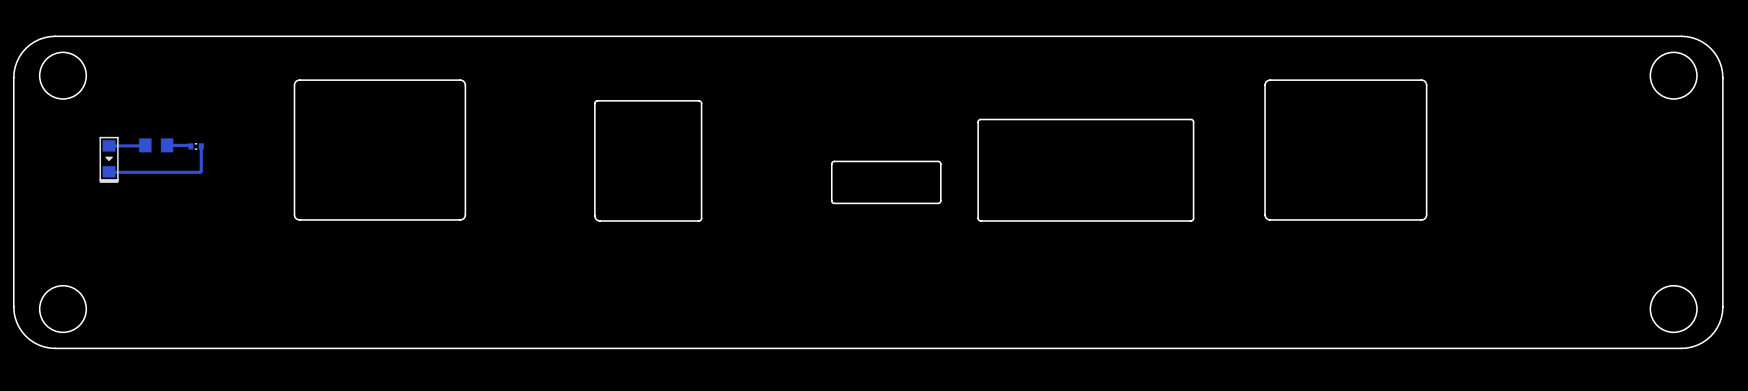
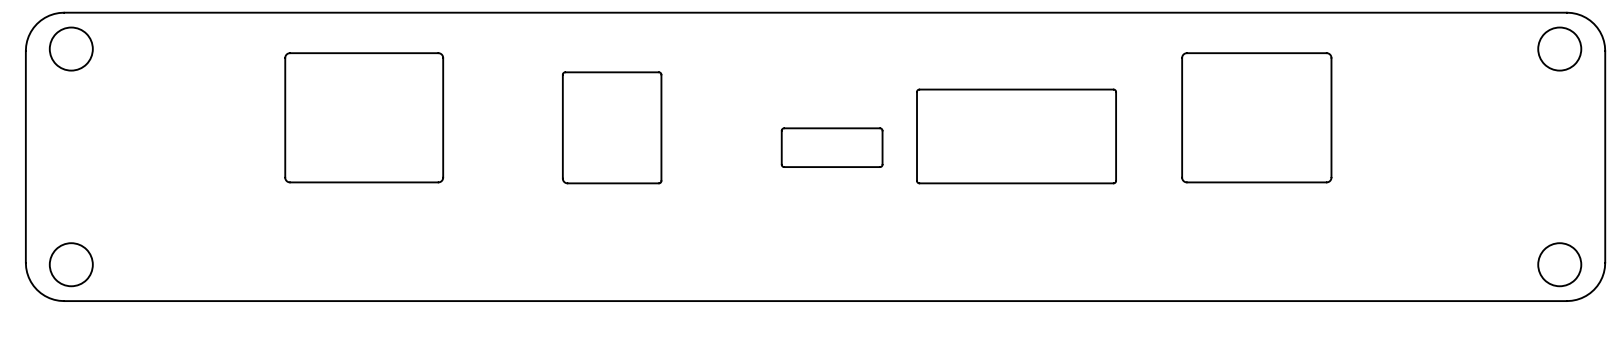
bottom track: (145, 145) (109, 145) -> none
part: (156, 145) -> none
bottom track: (167, 145) (190, 146) -> none
part: (196, 146) -> none
bottom track: (201, 146) (200, 172) (109, 171) -> none
part: (109, 159) -> none

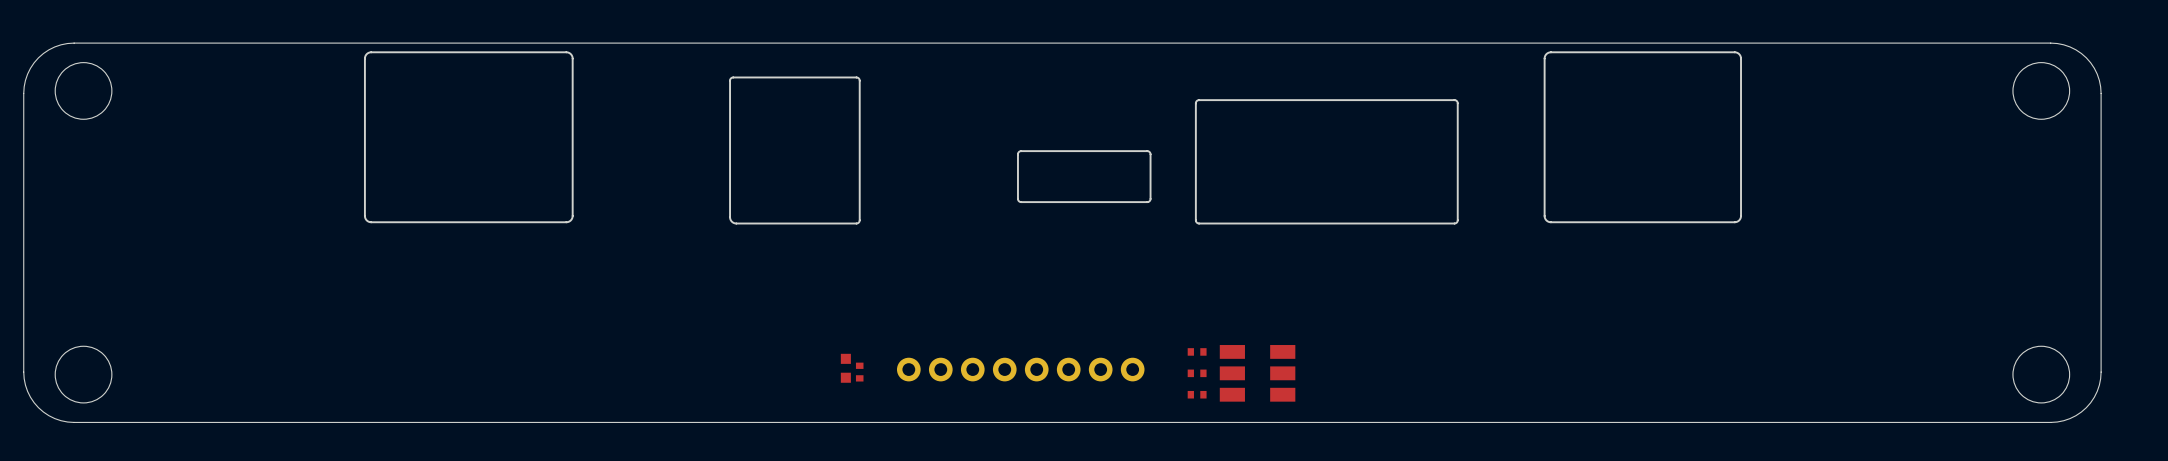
board edge: (443, 57) (438, 53) (290, 53) (285, 57) -> (572, 102) (572, 57) (570, 54) (566, 52) (369, 52) (364, 57) (364, 102)
board edge: (1331, 57) (1326, 53) (1186, 53) (1182, 57) -> (1741, 102) (1740, 57) (1739, 54) (1734, 52) (1549, 52) (1544, 57) (1544, 102)
board edge: (661, 74) (659, 72) (565, 72) (562, 74) -> (859, 124) (859, 80) (856, 77) (732, 77) (730, 80) (730, 124)
board edge: (1116, 91) (1113, 89) (919, 89) (917, 91) -> (1457, 147) (1457, 102) (1454, 100) (1198, 100) (1195, 103) (1195, 147)
board edge: (882, 130) (880, 128) (784, 128) (781, 130) -> (1150, 198) (1150, 153) (1147, 151) (1019, 151) (1017, 154) (1017, 198)
board edge: (882, 131) (882, 164) (880, 167) (783, 166) (781, 131) -> (1150, 198) (1147, 202) (1021, 202) (1017, 198)
board edge: (443, 144) (443, 178) (438, 182) (288, 182) (285, 178) (285, 144) -> (572, 215) (570, 220) (566, 222) (371, 222) (366, 220) (364, 215)
board edge: (1331, 144) (1331, 178) (1326, 182) (1185, 182) (1182, 178) (1182, 144) -> (1741, 215) (1739, 220) (1734, 222) (1550, 222) (1546, 220) (1544, 215)
board edge: (562, 145) (562, 179) (567, 183) (659, 183) (661, 147) -> (730, 217) (731, 221) (736, 223) (856, 223) (859, 220)
board edge: (1116, 147) (1116, 181) (1113, 183) (919, 183) (917, 180) (917, 147) -> (1457, 220) (1454, 223) (1199, 223) (1195, 220)
part: none -> (1197, 351)
part: none -> (845, 368)
part: none -> (1020, 369)
part: none -> (859, 372)
part: none -> (1197, 373)
part: none -> (1257, 373)
part: none -> (1197, 394)

